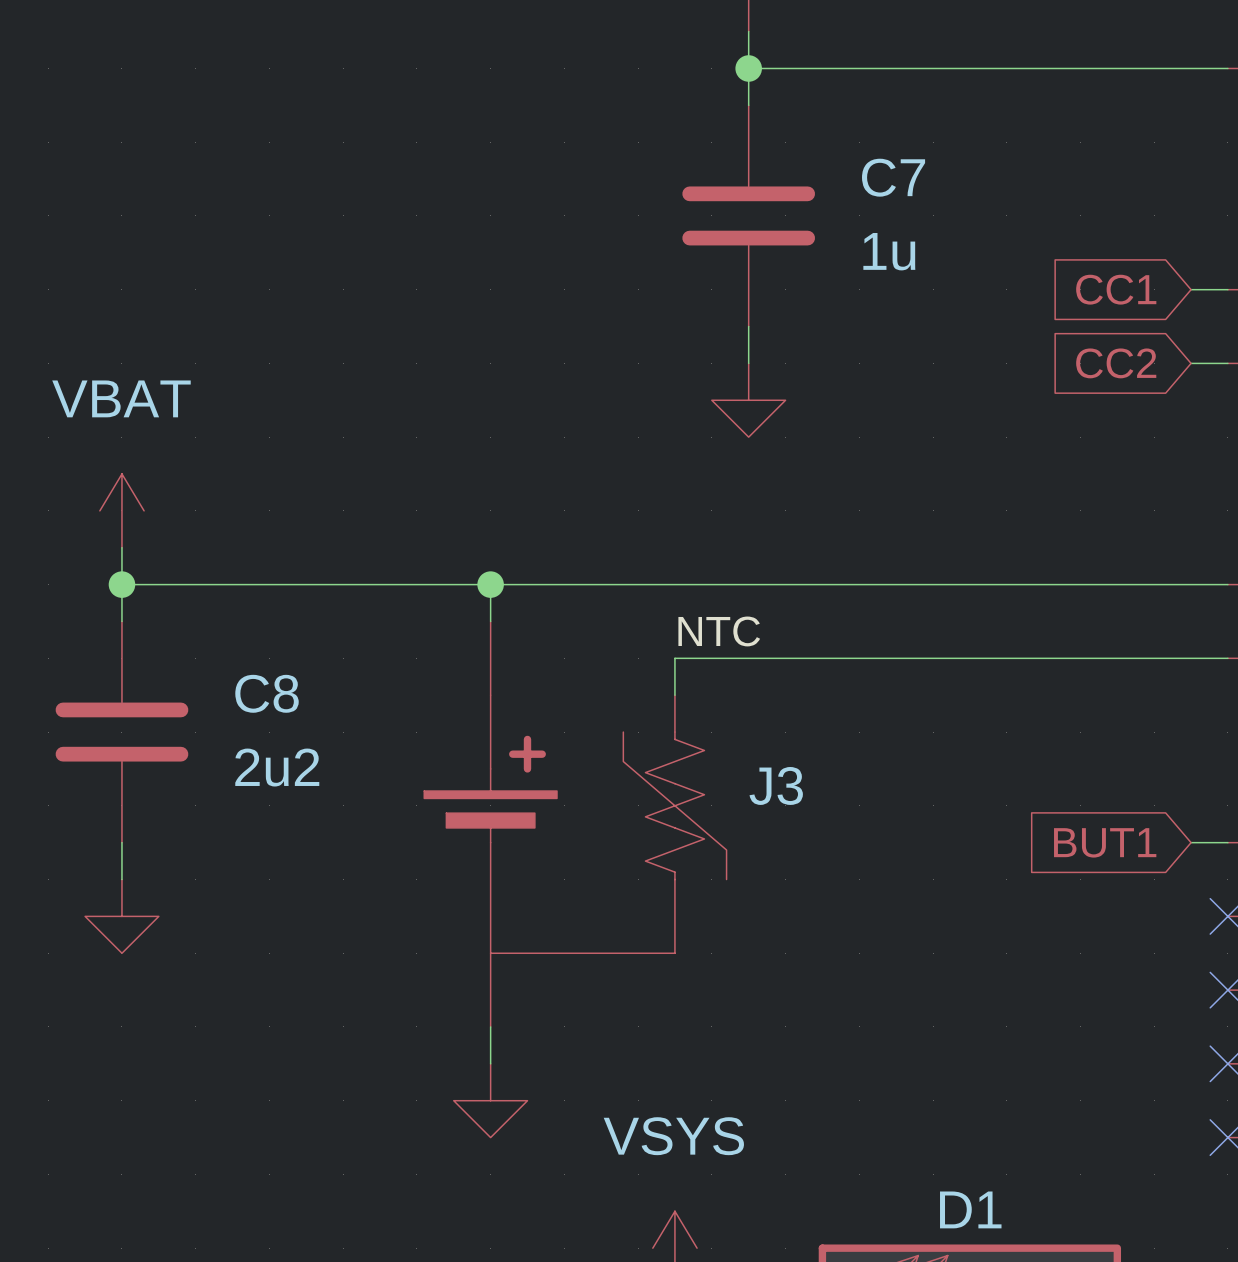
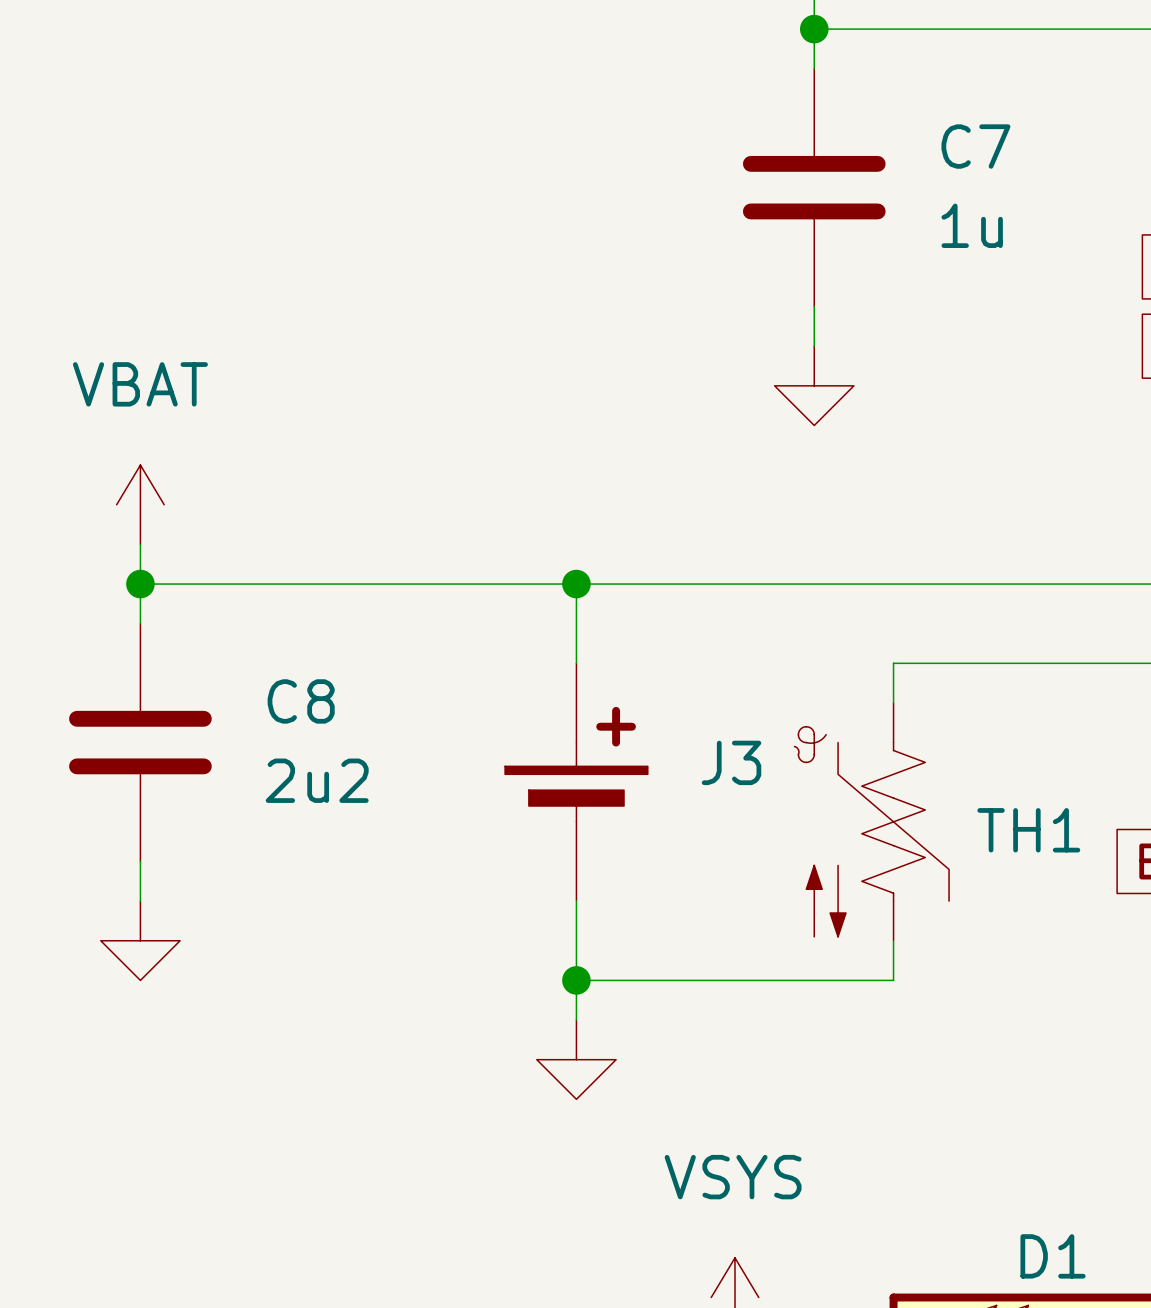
wire: (490, 584) (490, 621) -> none
junction position: (490, 584) -> (576, 584)
wire: none -> (576, 584) (576, 663)
J3 symbol: [424, 621, 727, 1027] -> [505, 663, 648, 902]
label: NTC (719, 631) -> none
wire: (822, 658) (674, 658) (674, 695) -> (893, 663) (893, 702)
J3 name position: J3 (776, 785) -> J3 (731, 762)
TH1: none -> (871, 821)
wire: none -> (576, 901) (576, 1020)
wire: none -> (893, 940) (893, 980) (576, 980)
junction: none -> (576, 980)
wire: (490, 1026) (490, 1063) -> none
power symbol position: (490, 1100) -> (576, 1059)

